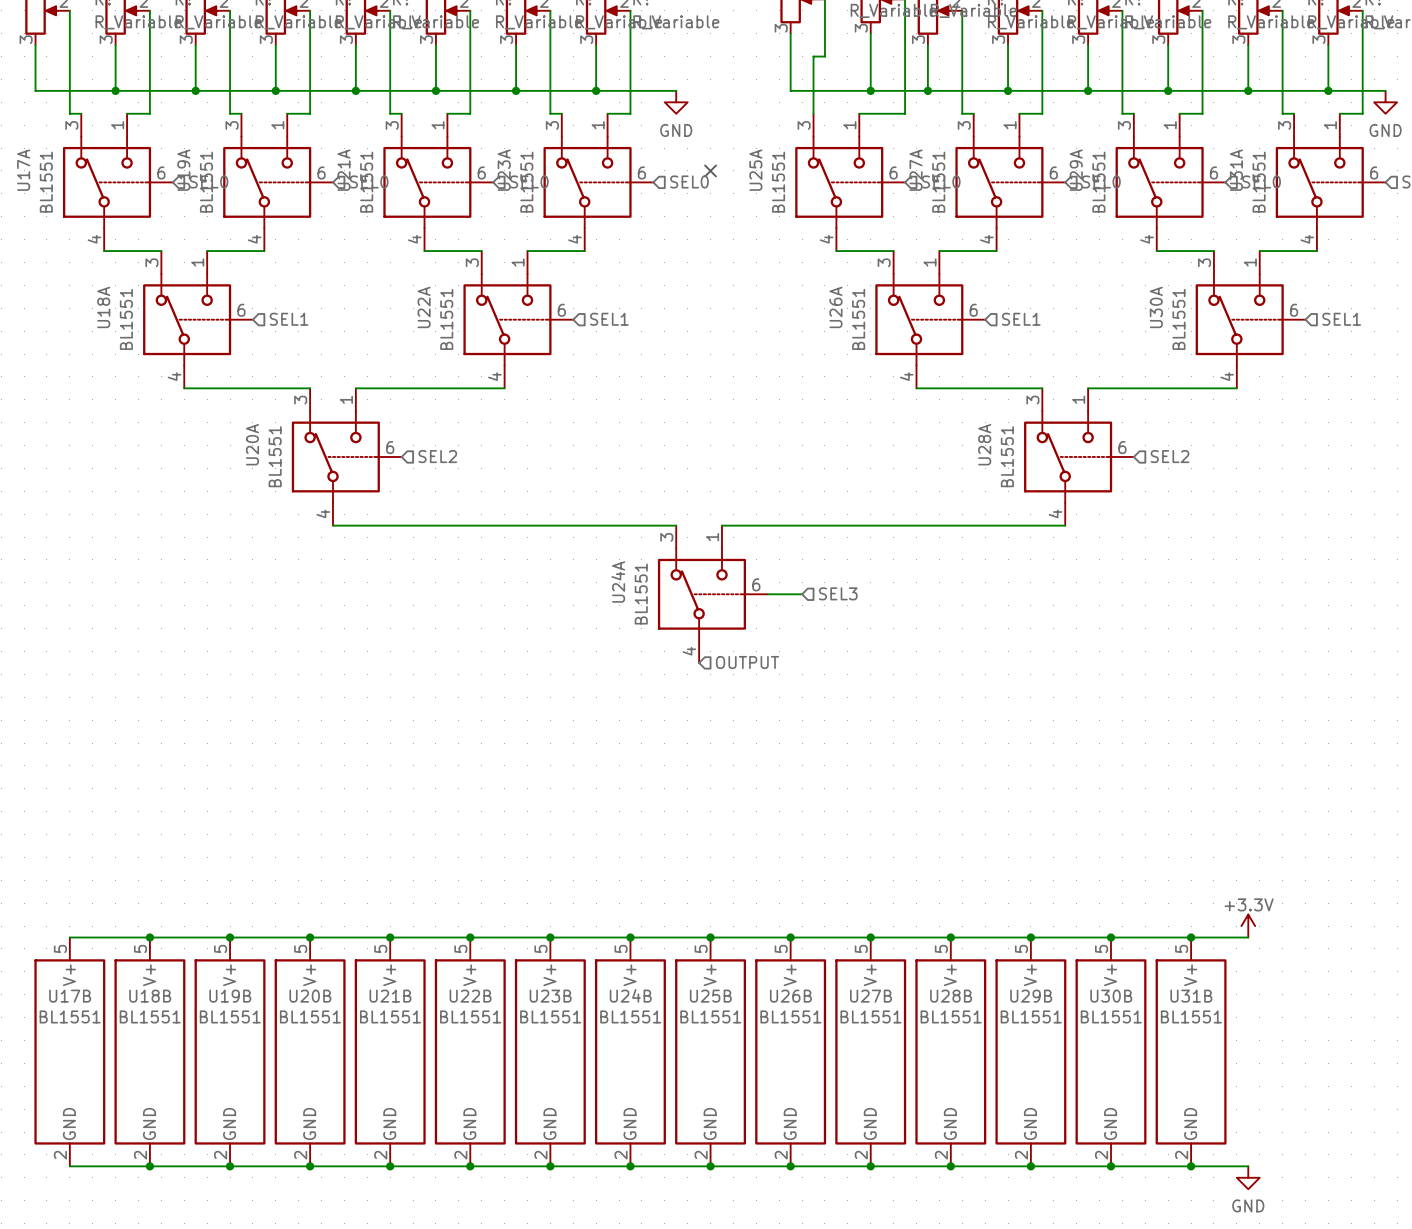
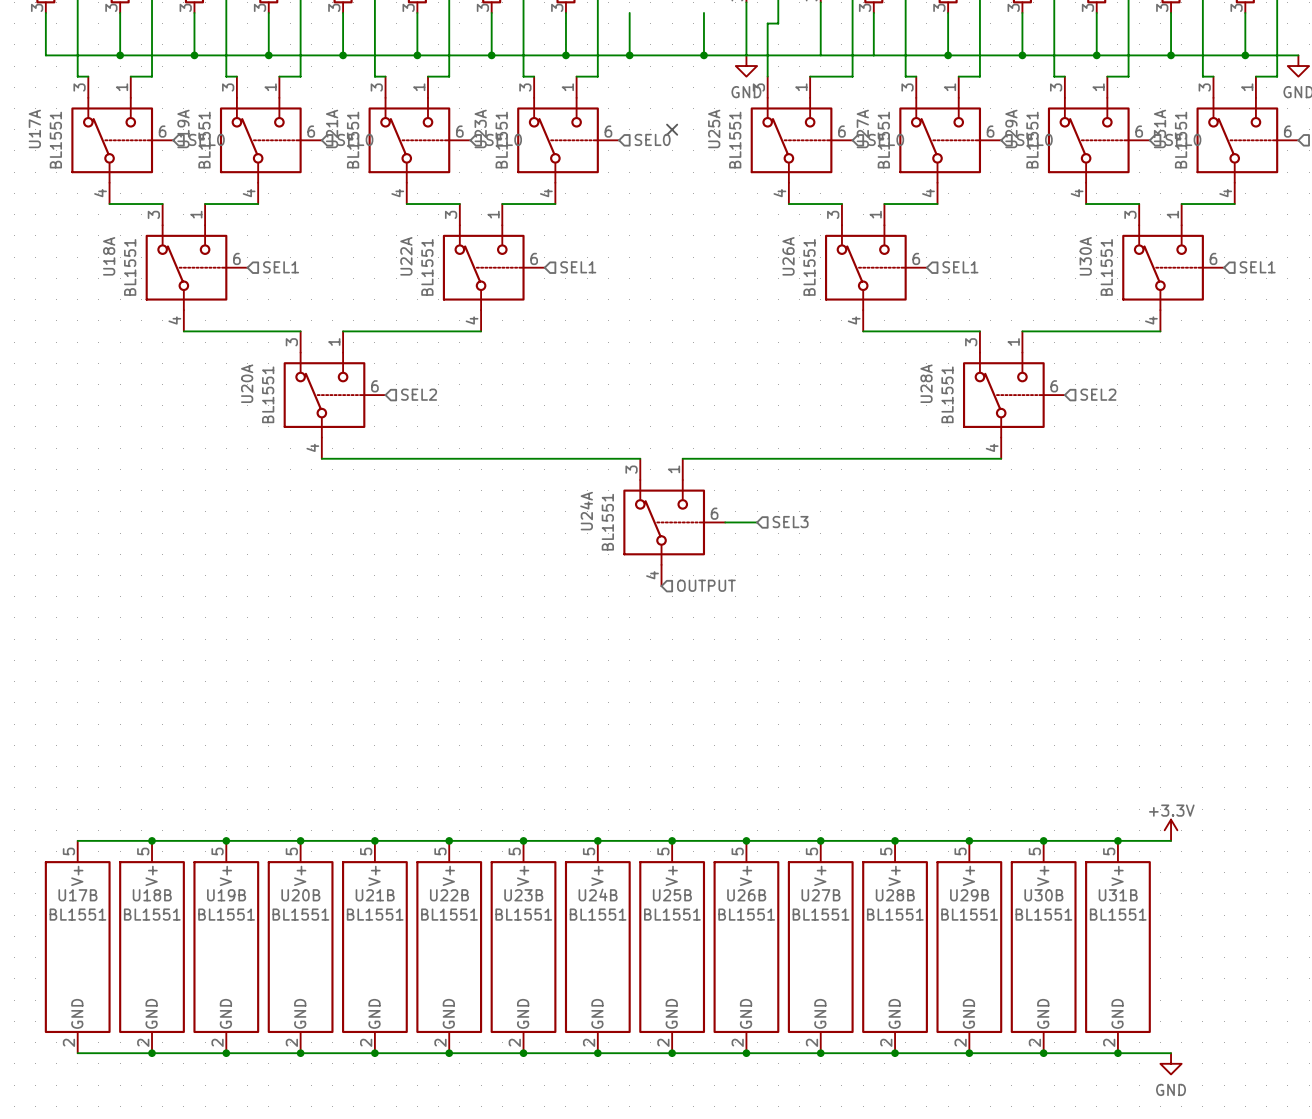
wire: none -> (629, 12) (629, 55)
wire: none -> (703, 12) (703, 55)
junction: none -> (629, 55)
wire: none -> (640, 55) (746, 55)
junction: none -> (703, 55)
junction: (870, 90) -> none
junction: (927, 90) -> none
power symbol position: GND (676, 102) -> GND (746, 66)

